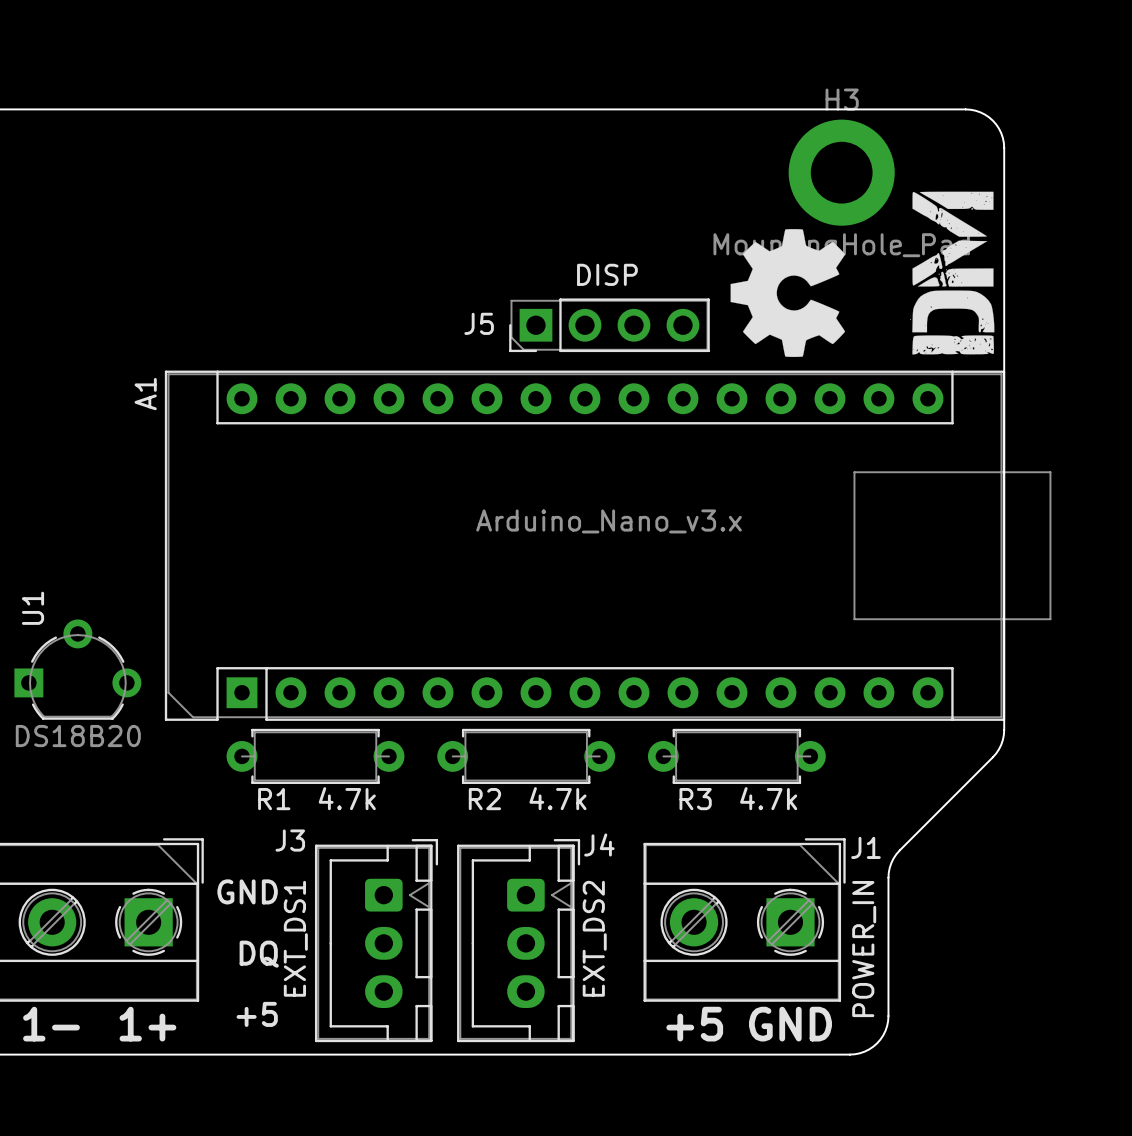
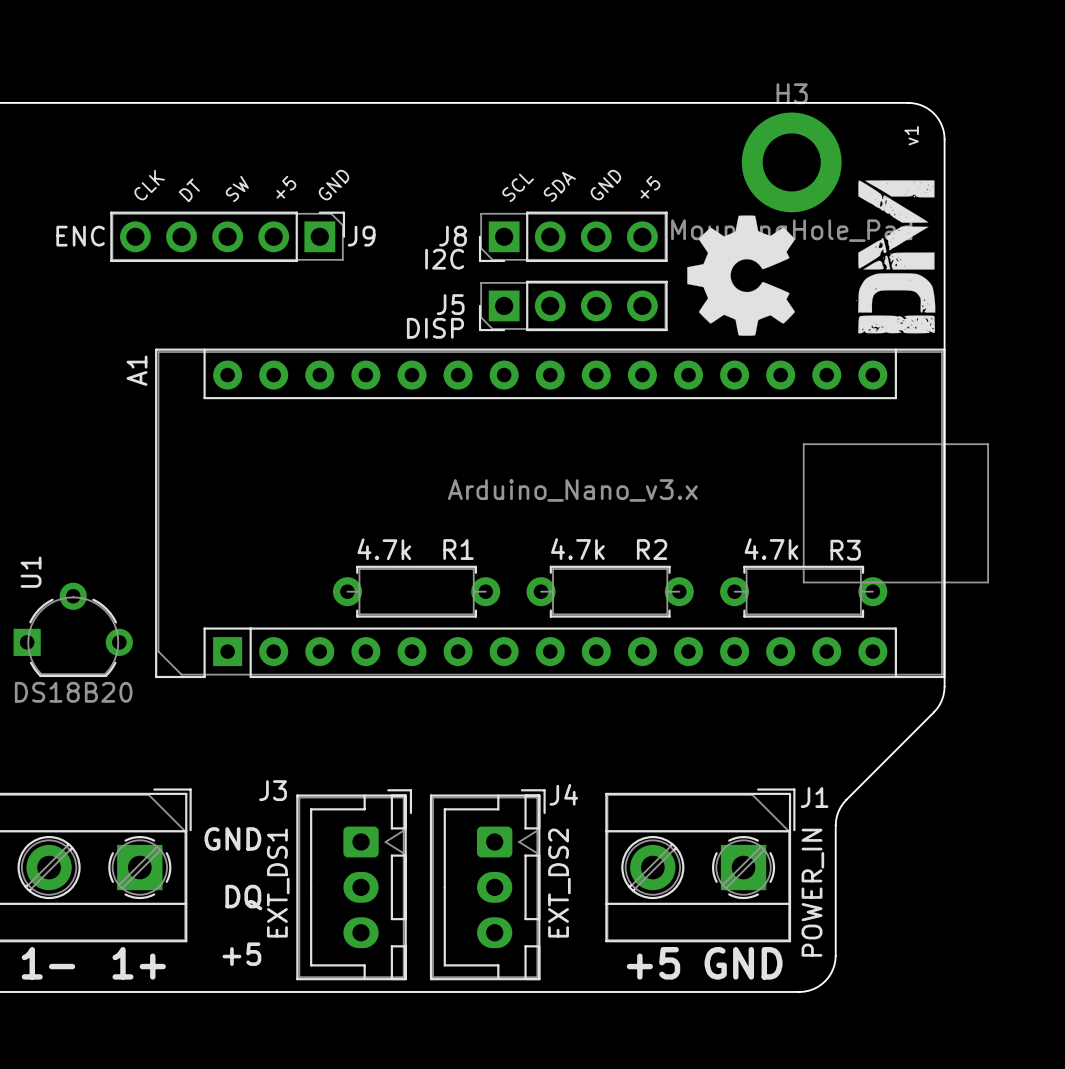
text: none -> v1 (911, 135)
text: none -> CLK (149, 185)
text: none -> GND (334, 185)
text: none -> GND (605, 185)
text: none -> SDA (559, 187)
text: none -> +5 (286, 187)
text: none -> SCL (518, 187)
text: none -> +5 (650, 187)
text: none -> SW (237, 188)
text: none -> DT (189, 190)
J9: none -> ENC (227, 236)
J8: none -> I2C (573, 236)
J5 value position: DISP (607, 274) -> DISP (435, 328)
R1 position: (315, 756) -> (416, 591)
R2 position: (526, 756) -> (610, 591)
R3 position: (736, 756) -> (803, 591)
R1 value position: 4.7k (347, 798) -> 4.7k (384, 549)
R2 value position: 4.7k (557, 798) -> 4.7k (577, 549)
R3 value position: 4.7k (768, 798) -> 4.7k (771, 549)
R1 name position: R1 (274, 799) -> R1 (458, 549)
R2 name position: R2 (484, 799) -> R2 (652, 549)
R3 name position: R3 (695, 799) -> R3 (845, 550)

